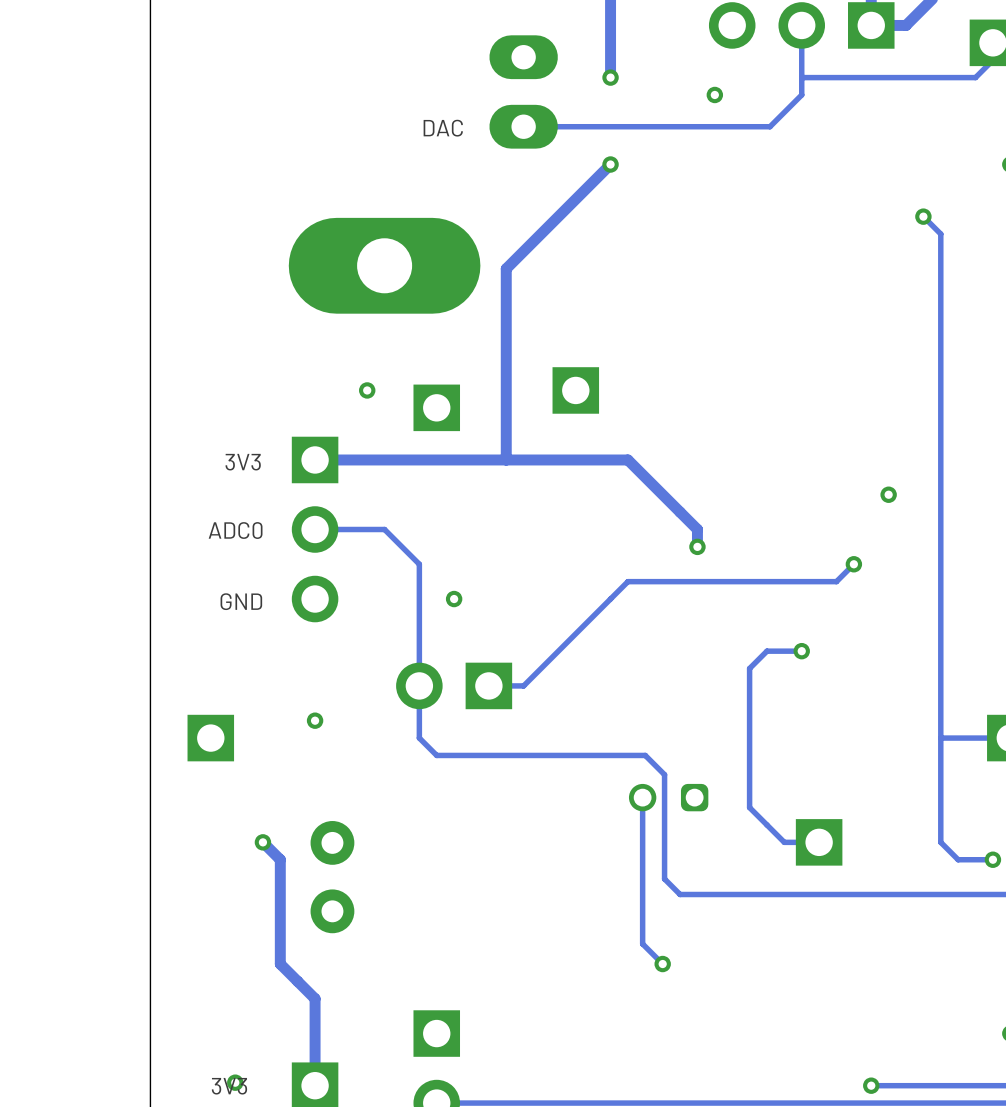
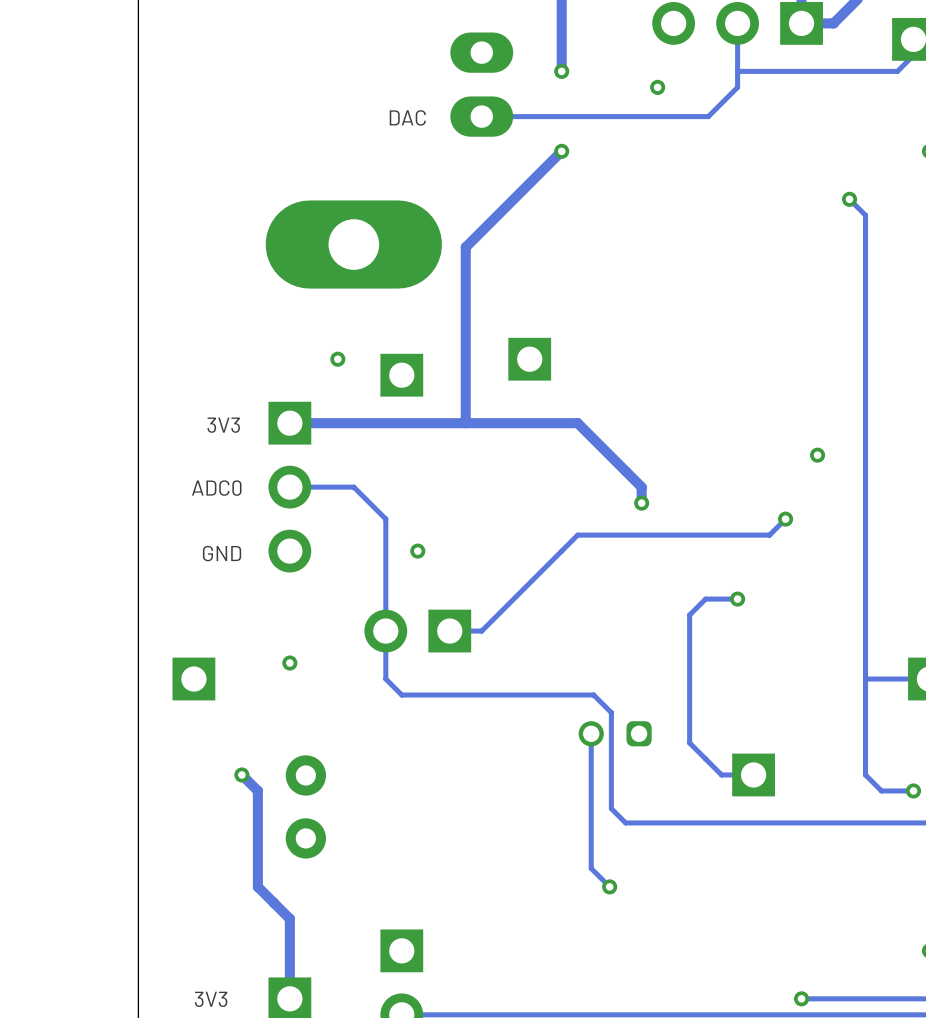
via: (235, 1082) -> none

